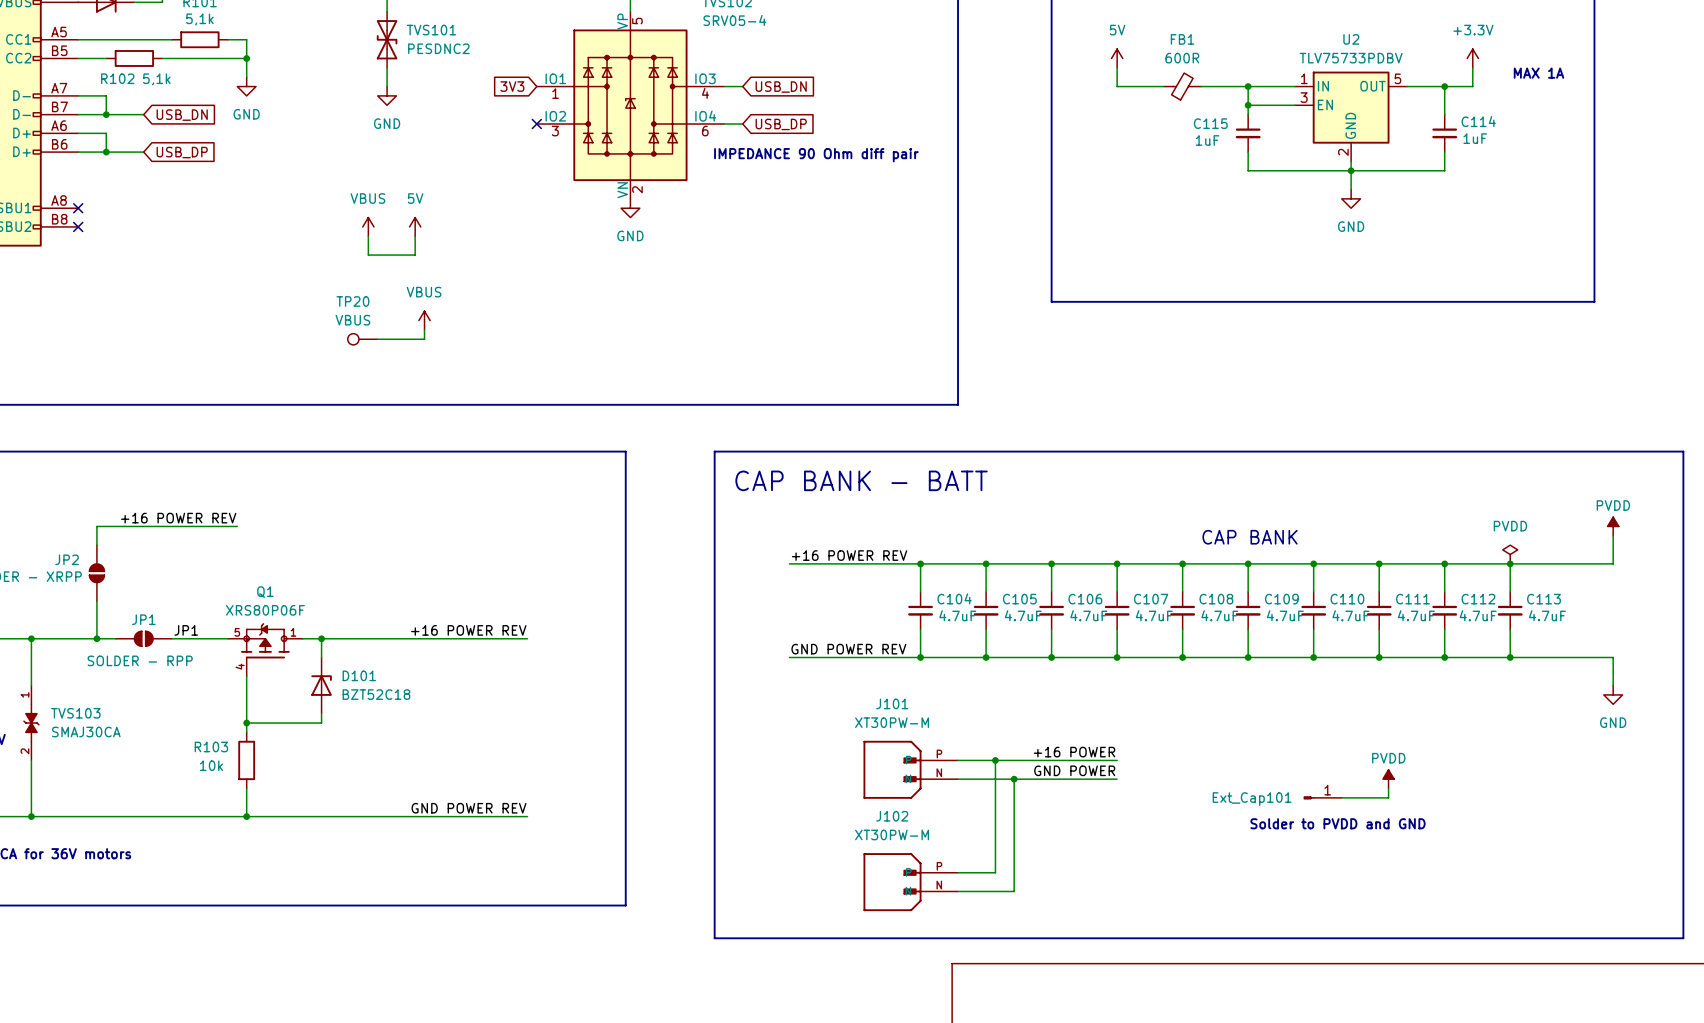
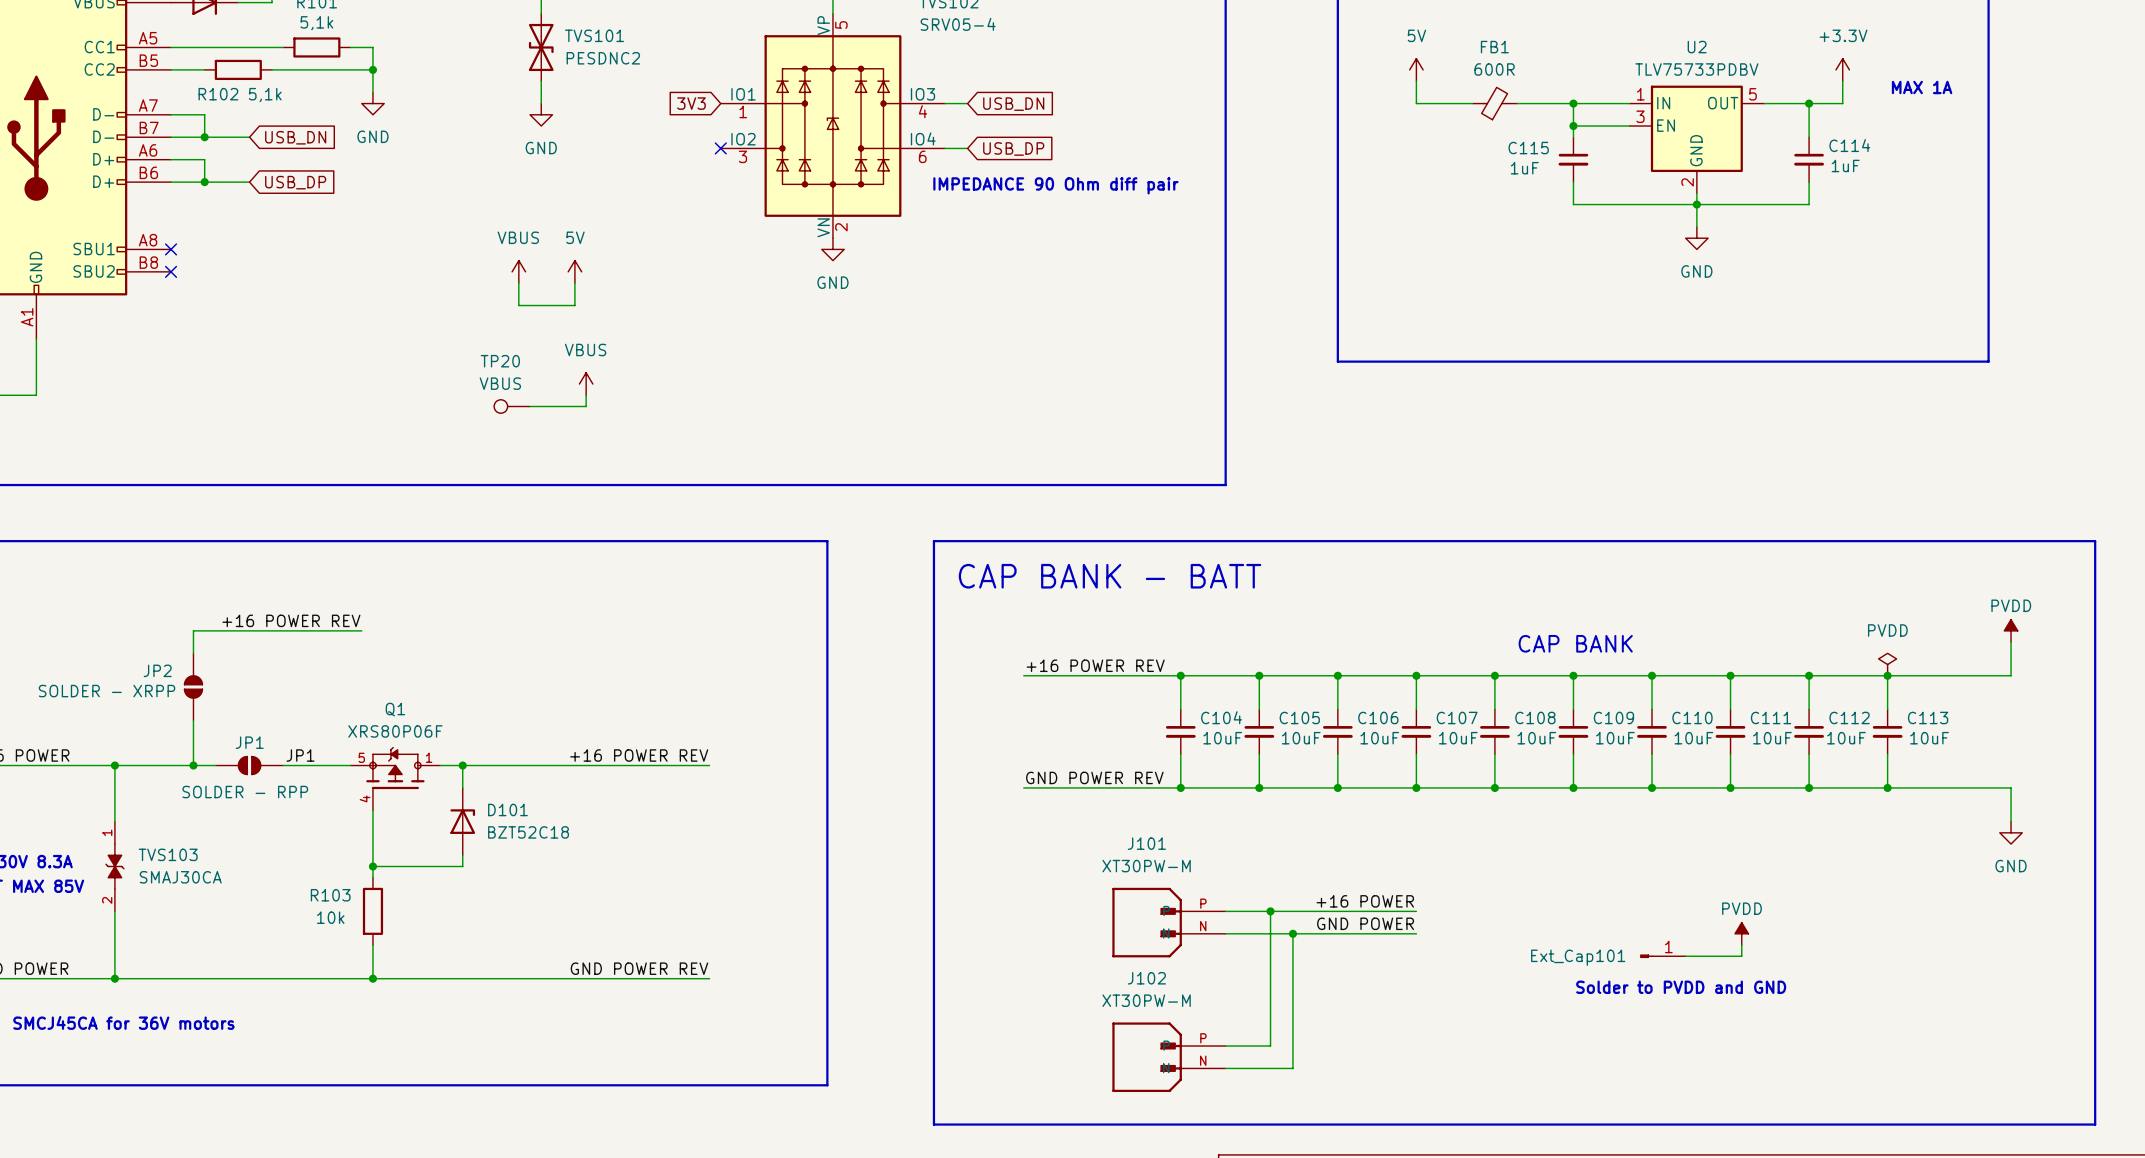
C104 value: 4.7uF (957, 615) -> 10uF (1222, 738)
C105 value: 4.7uF (1023, 615) -> 10uF (1301, 738)
C106 value: 4.7uF (1088, 615) -> 10uF (1379, 738)
C107 value: 4.7uF (1154, 615) -> 10uF (1458, 738)
C108 value: 4.7uF (1219, 615) -> 10uF (1536, 738)
C109 value: 4.7uF (1285, 615) -> 10uF (1615, 738)
C110 value: 4.7uF (1350, 615) -> 10uF (1693, 738)
C111 value: 4.7uF (1416, 615) -> 10uF (1772, 738)
C112 value: 4.7uF (1478, 615) -> 10uF (1846, 738)
C113 value: 4.7uF (1547, 615) -> 10uF (1929, 738)

